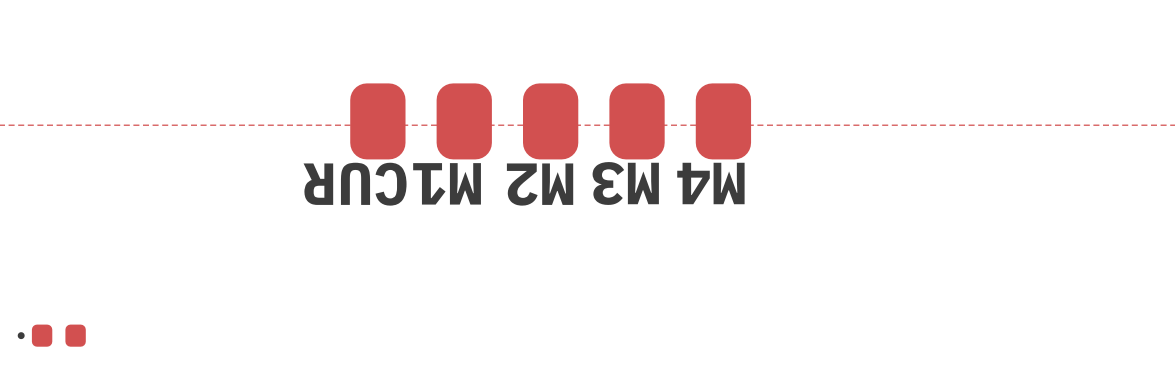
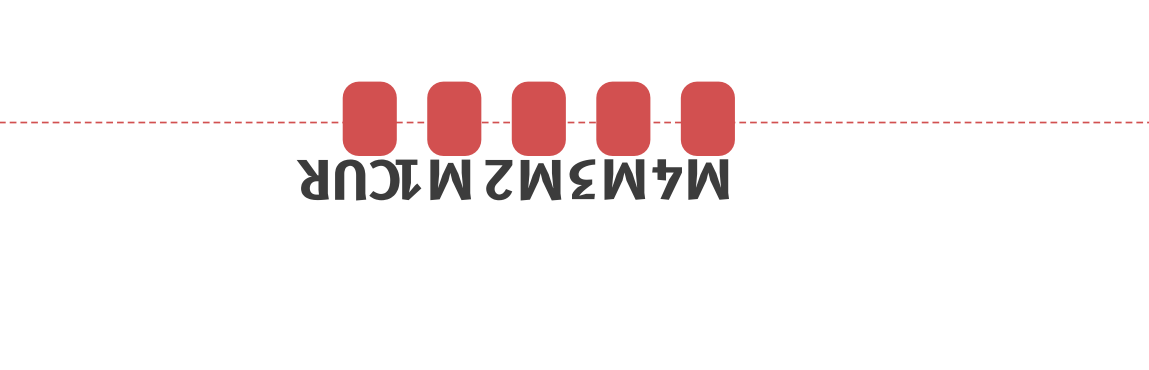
part: (51, 335) -> none

